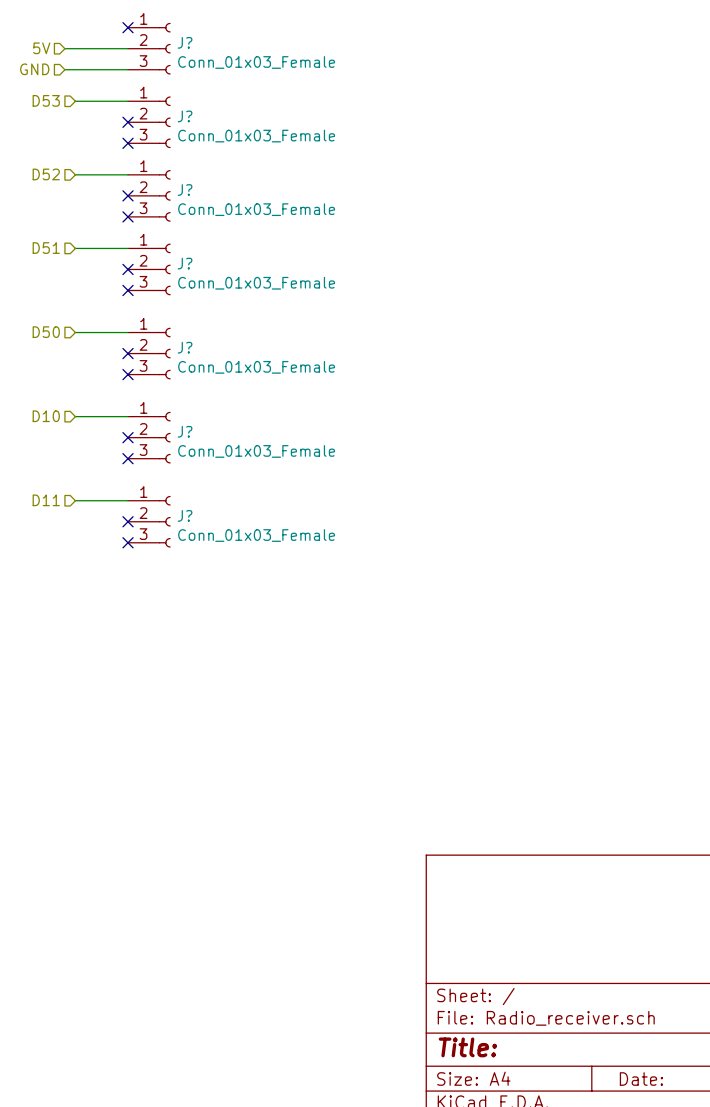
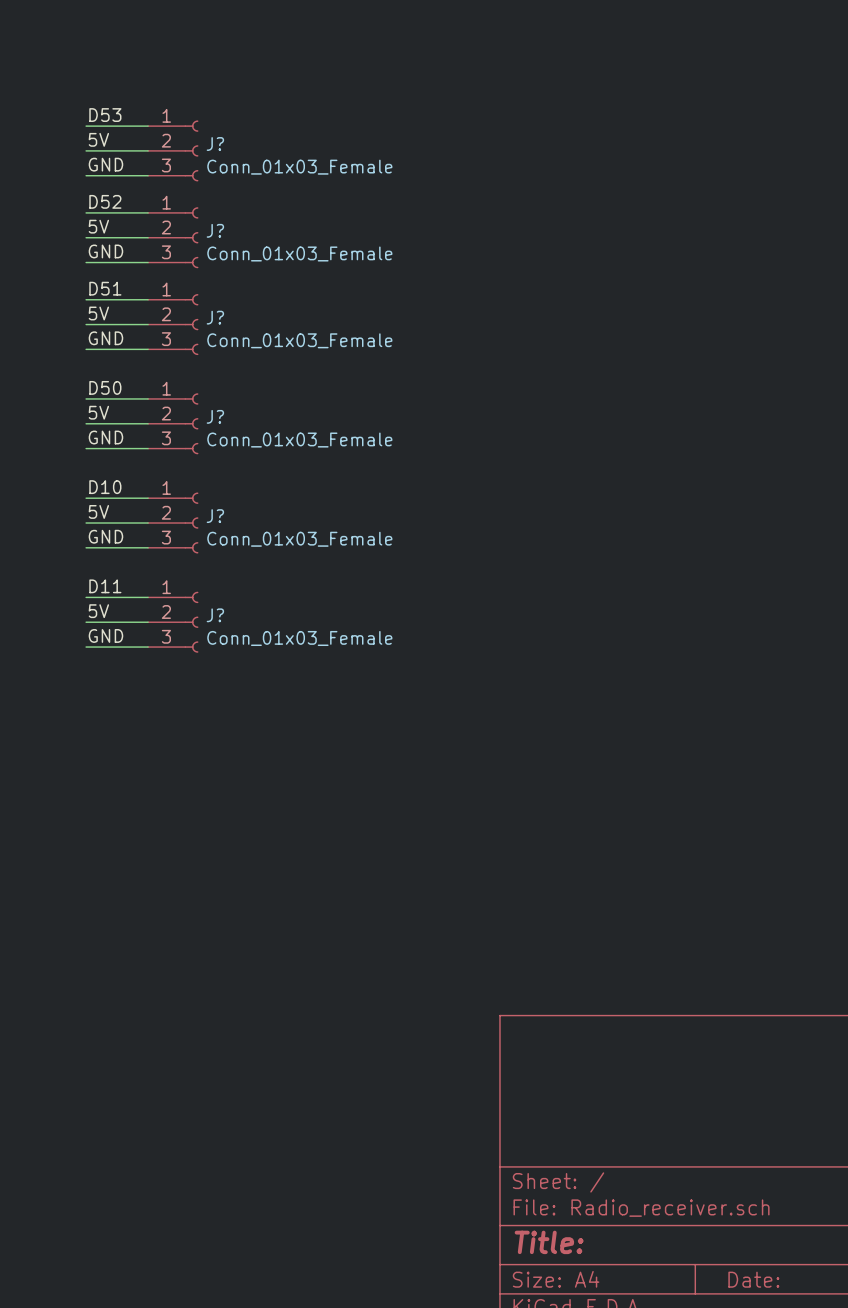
no-connect mark: (128, 27) -> none
hierarchical label: 5V (41, 48) -> none
wire: (64, 48) (128, 48) -> none
J?: Conn_01x03_Female (149, 48) -> none
hierarchical label: GND (34, 69) -> none
wire: (64, 69) (128, 69) -> none
label: none -> D53 (105, 115)
hierarchical label: D53 (46, 100) -> none
label: none -> 5V (98, 139)
wire: none -> (86, 150) (148, 150)
no-connect mark: (128, 122) -> none
label: none -> GND (105, 164)
wire: none -> (86, 175) (148, 175)
no-connect mark: (128, 143) -> none
label: none -> D52 (105, 201)
hierarchical label: D52 (46, 174) -> none
label: none -> 5V (98, 226)
wire: none -> (86, 237) (148, 237)
no-connect mark: (128, 195) -> none
label: none -> GND (105, 251)
wire: none -> (86, 262) (148, 262)
no-connect mark: (128, 216) -> none
label: none -> D51 (105, 288)
hierarchical label: D51 (46, 248) -> none
label: none -> 5V (98, 313)
wire: none -> (86, 324) (148, 324)
no-connect mark: (128, 269) -> none
label: none -> GND (105, 338)
wire: none -> (86, 349) (148, 349)
no-connect mark: (128, 290) -> none
label: none -> D50 (105, 387)
hierarchical label: D50 (46, 332) -> none
label: none -> 5V (98, 412)
wire: none -> (86, 423) (148, 423)
no-connect mark: (128, 353) -> none
label: none -> GND (105, 437)
wire: none -> (86, 448) (148, 448)
no-connect mark: (128, 374) -> none
label: none -> D10 (105, 487)
hierarchical label: D10 (46, 416) -> none
label: none -> 5V (98, 511)
wire: none -> (86, 523) (148, 523)
no-connect mark: (128, 437) -> none
label: none -> GND (105, 536)
wire: none -> (86, 547) (148, 547)
no-connect mark: (128, 458) -> none
label: none -> D11 (105, 586)
hierarchical label: D11 (46, 500) -> none
label: none -> 5V (98, 611)
wire: none -> (86, 622) (148, 622)
no-connect mark: (128, 521) -> none
label: none -> GND (105, 635)
wire: none -> (86, 647) (148, 647)
no-connect mark: (128, 542) -> none

